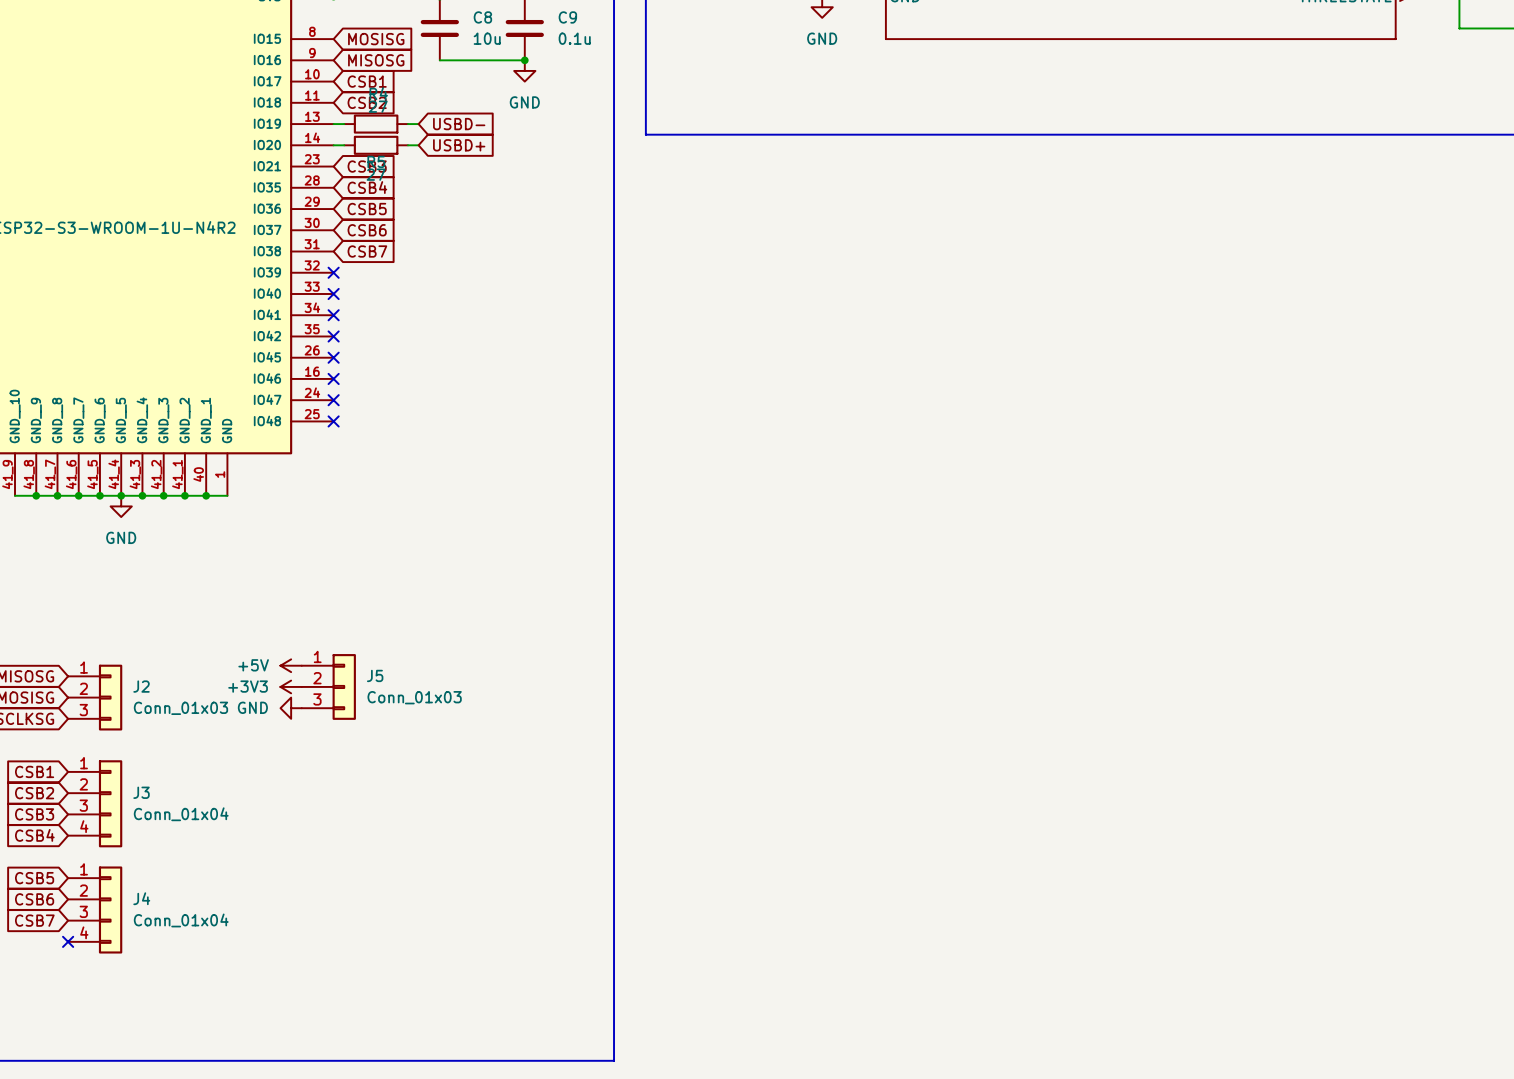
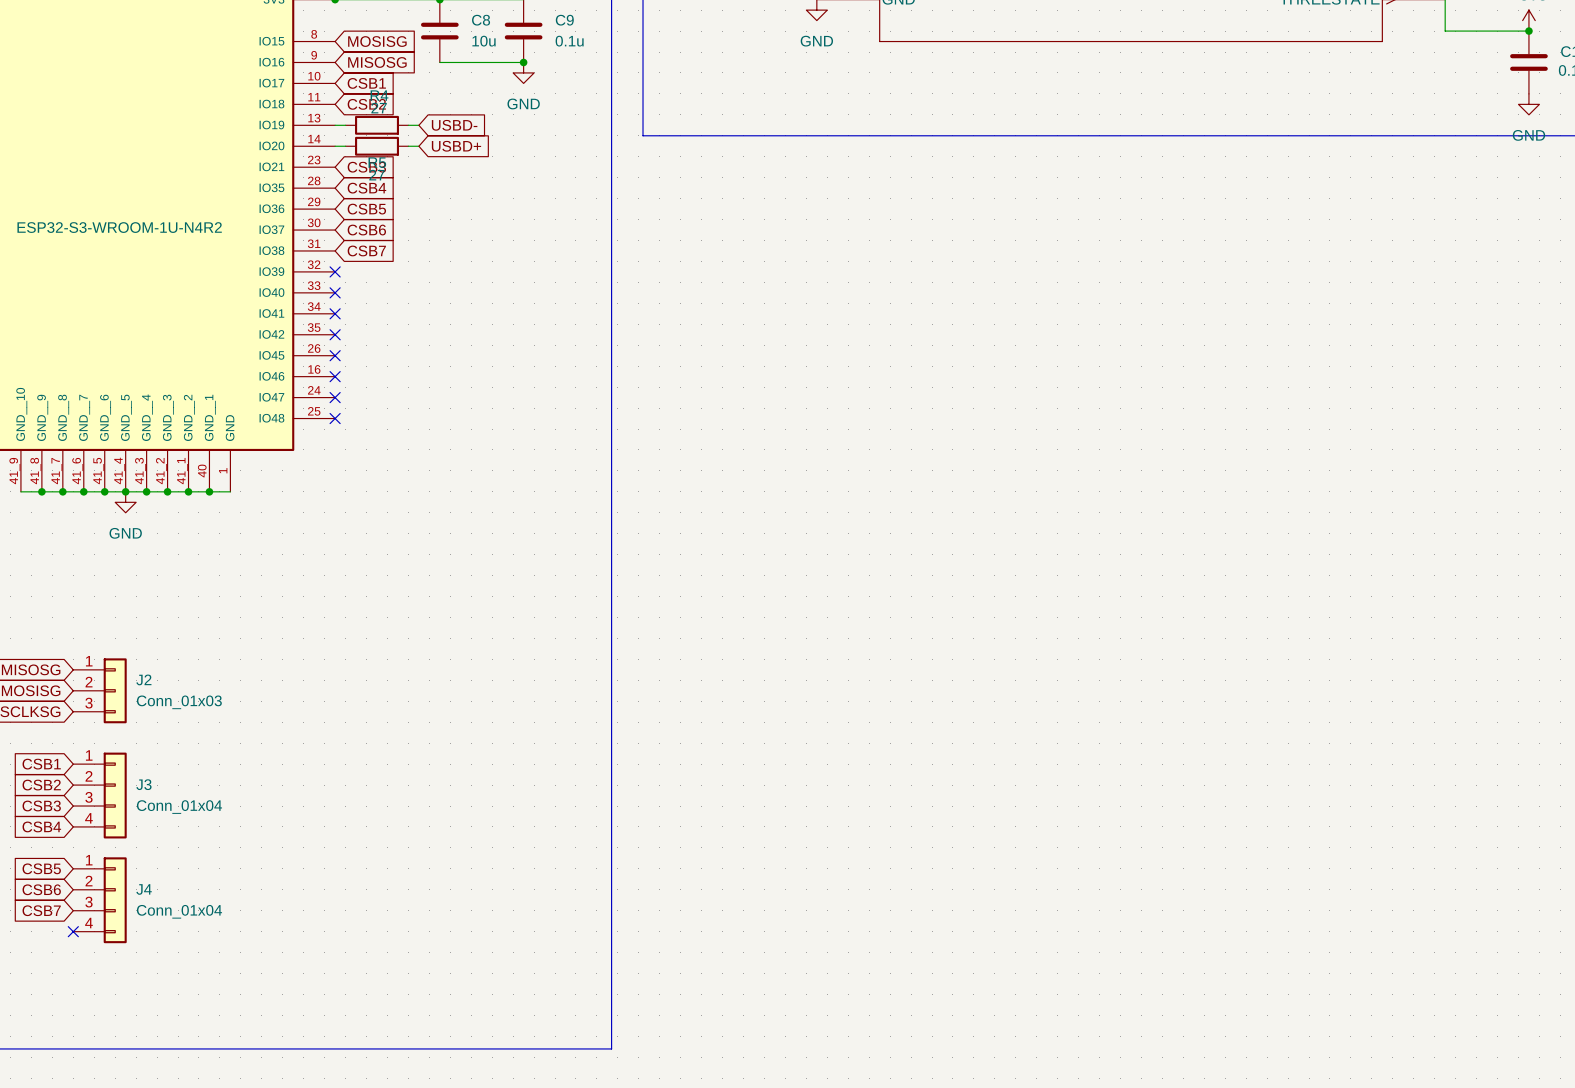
power symbol: +5V (291, 665) -> none
power symbol: +3V3 (291, 686) -> none
J5: Conn_01x03 (328, 686) -> none
power symbol: GND (291, 708) -> none

